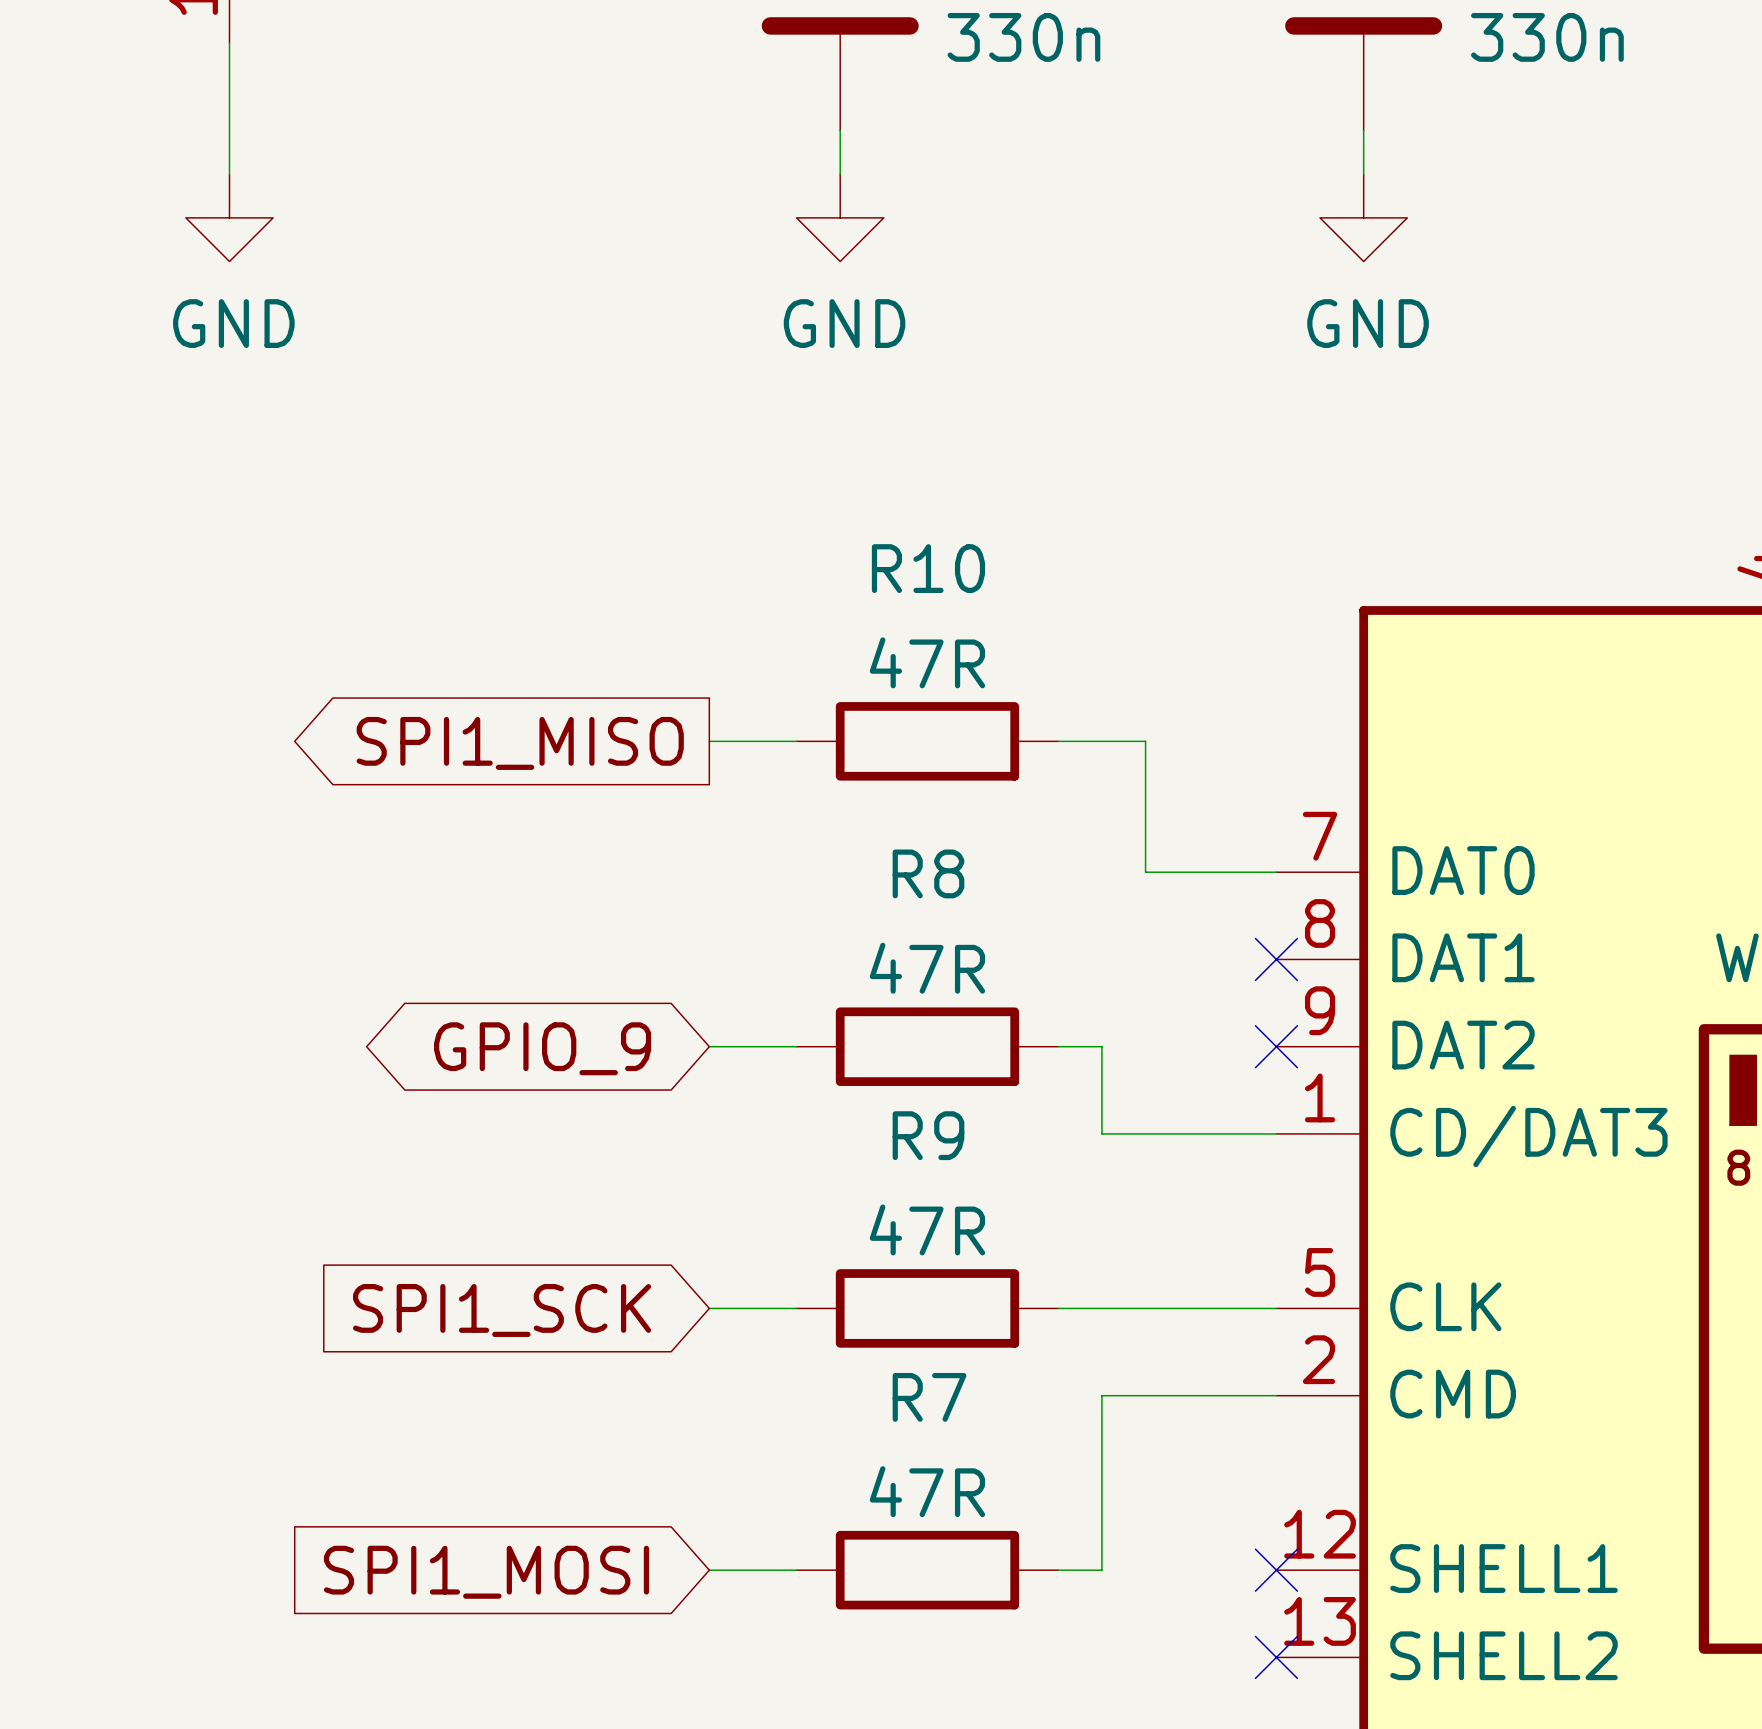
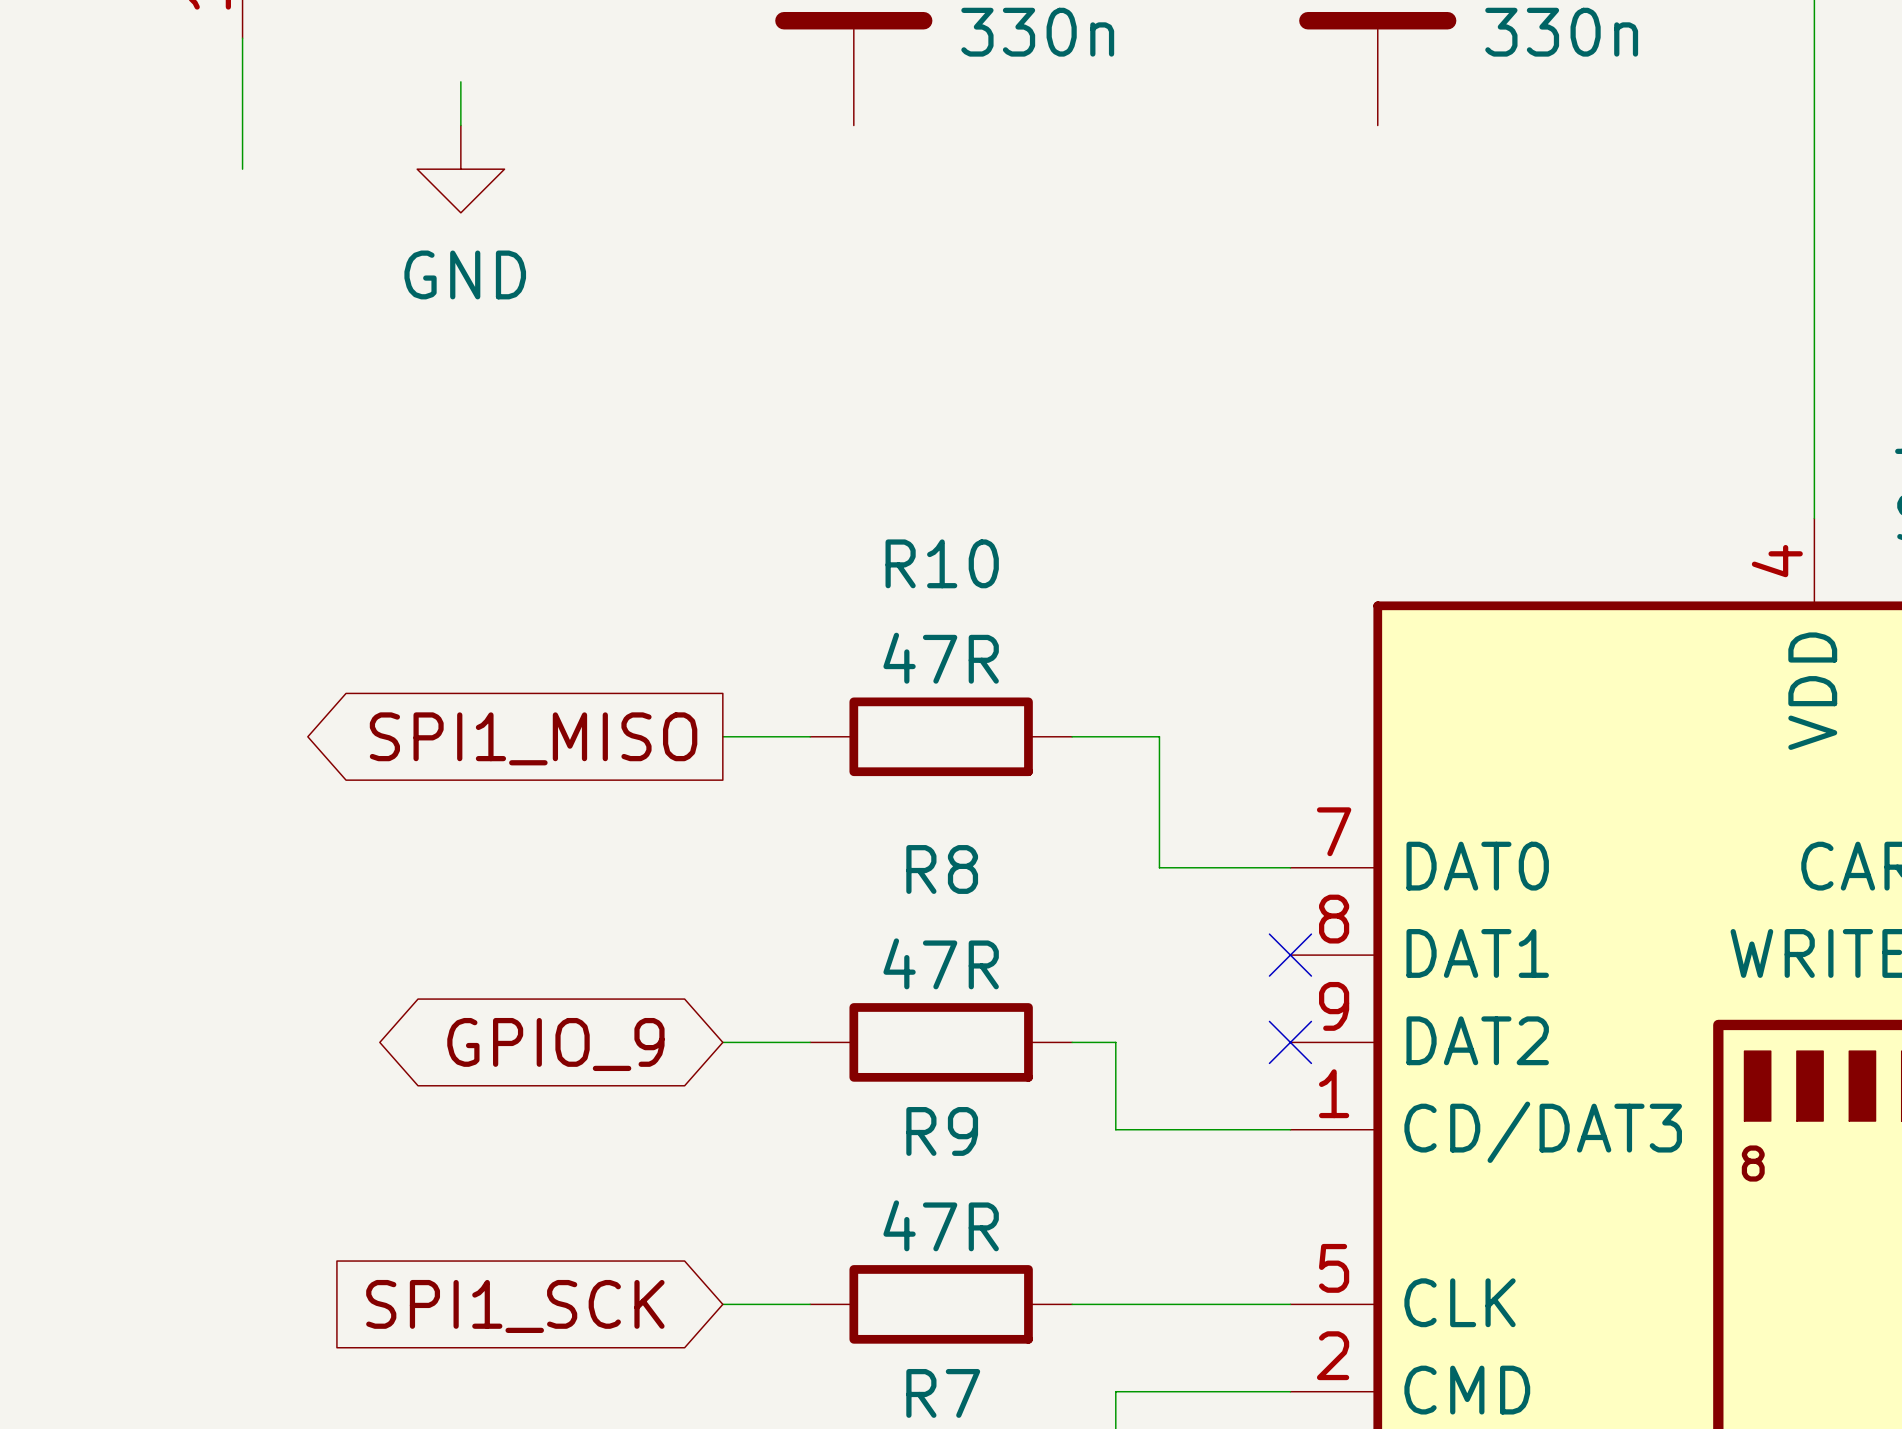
wire: (840, 130) (840, 174) -> (460, 81) (460, 125)
wire: (1363, 130) (1363, 174) -> none
power symbol: none -> GND (460, 169)
power symbol: GND (229, 217) -> none
power symbol: GND (840, 217) -> none
power symbol: GND (1363, 217) -> none

